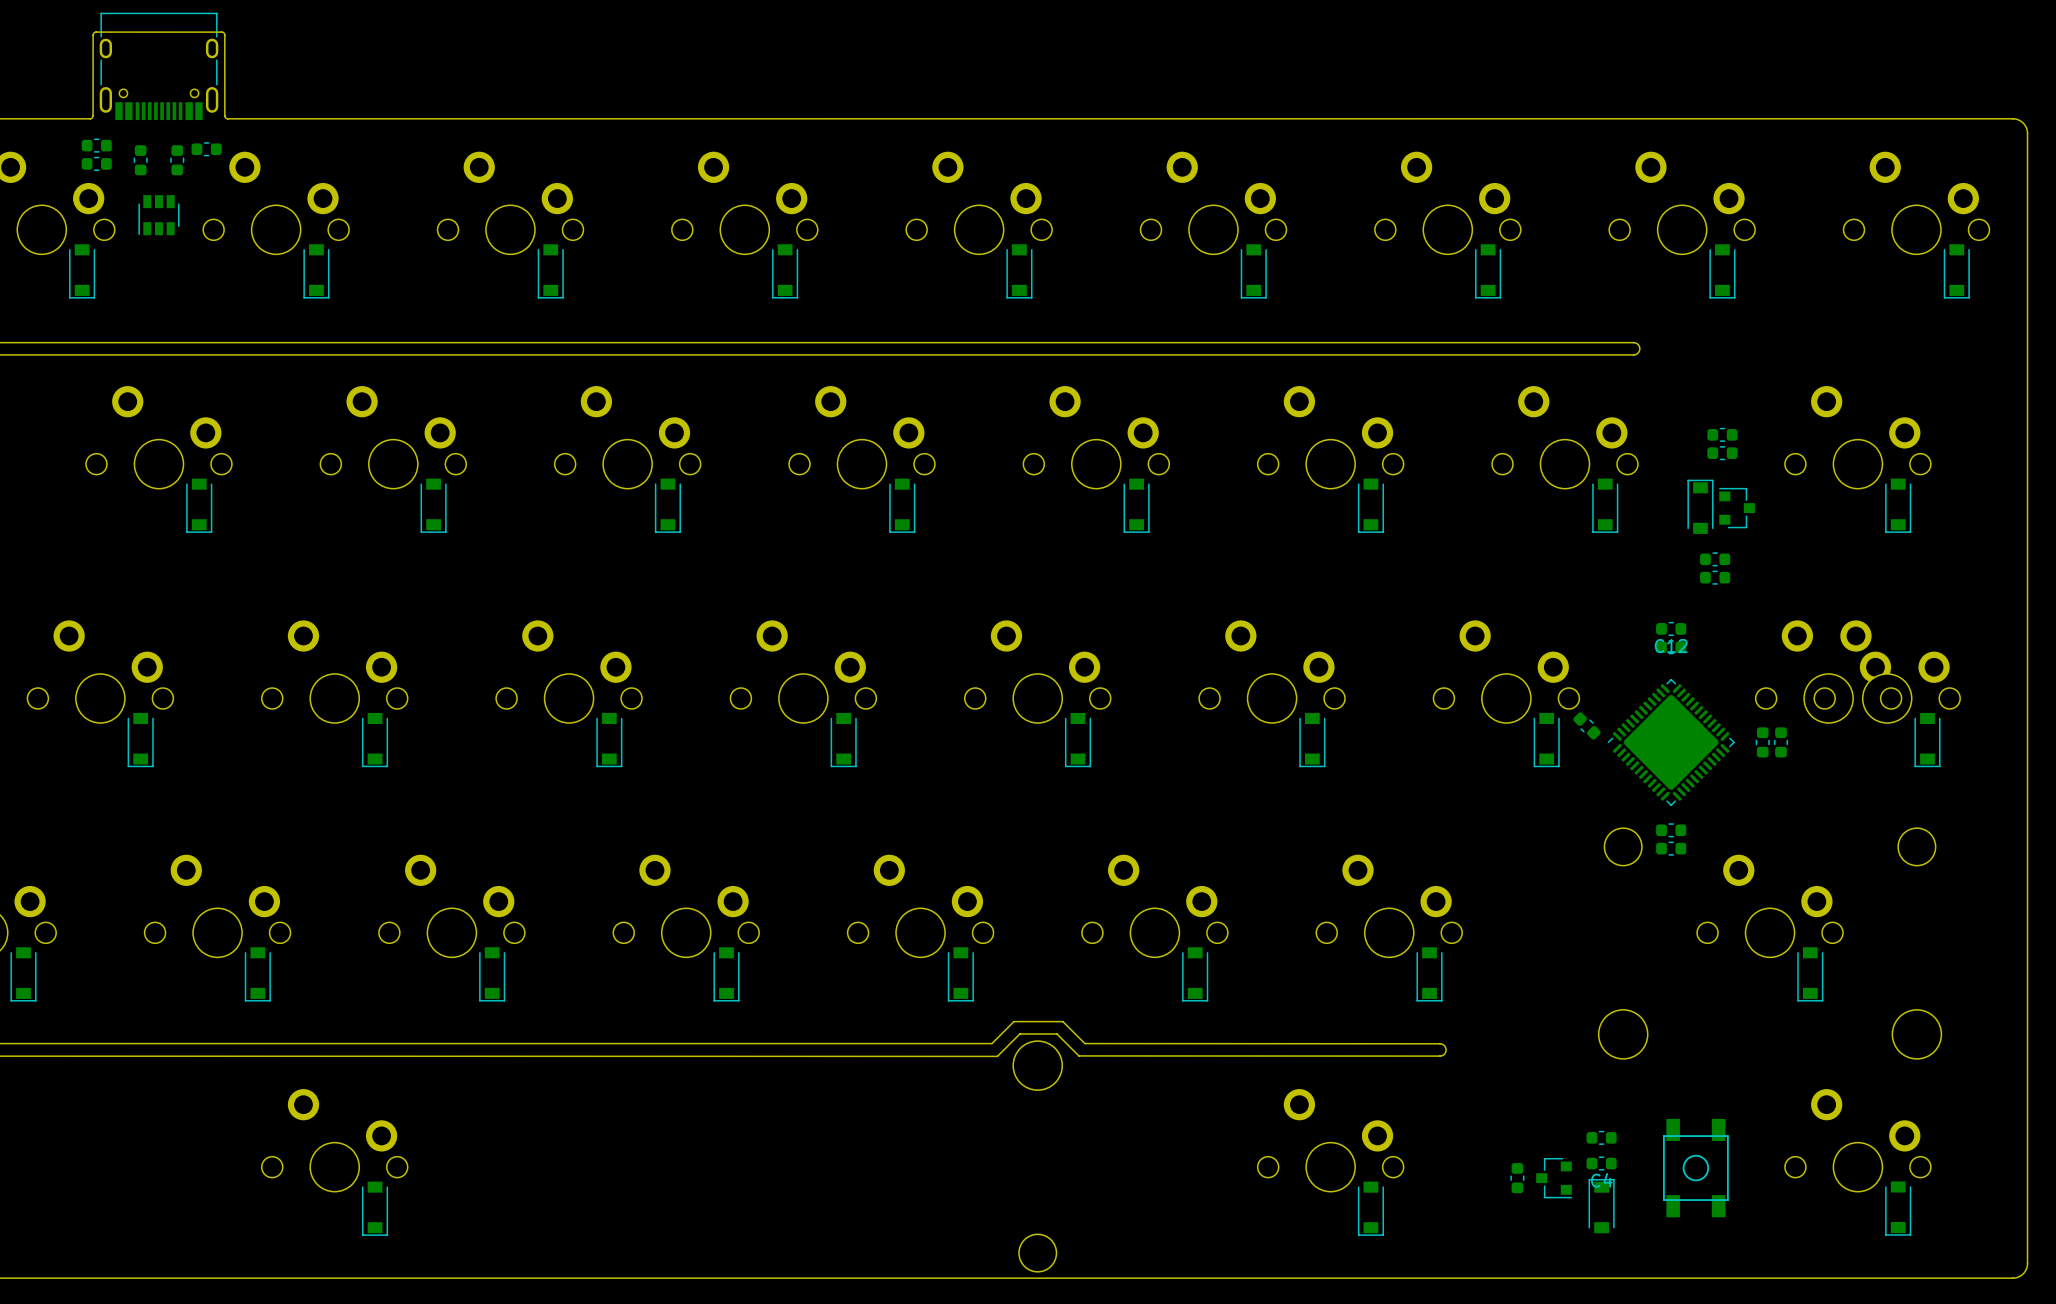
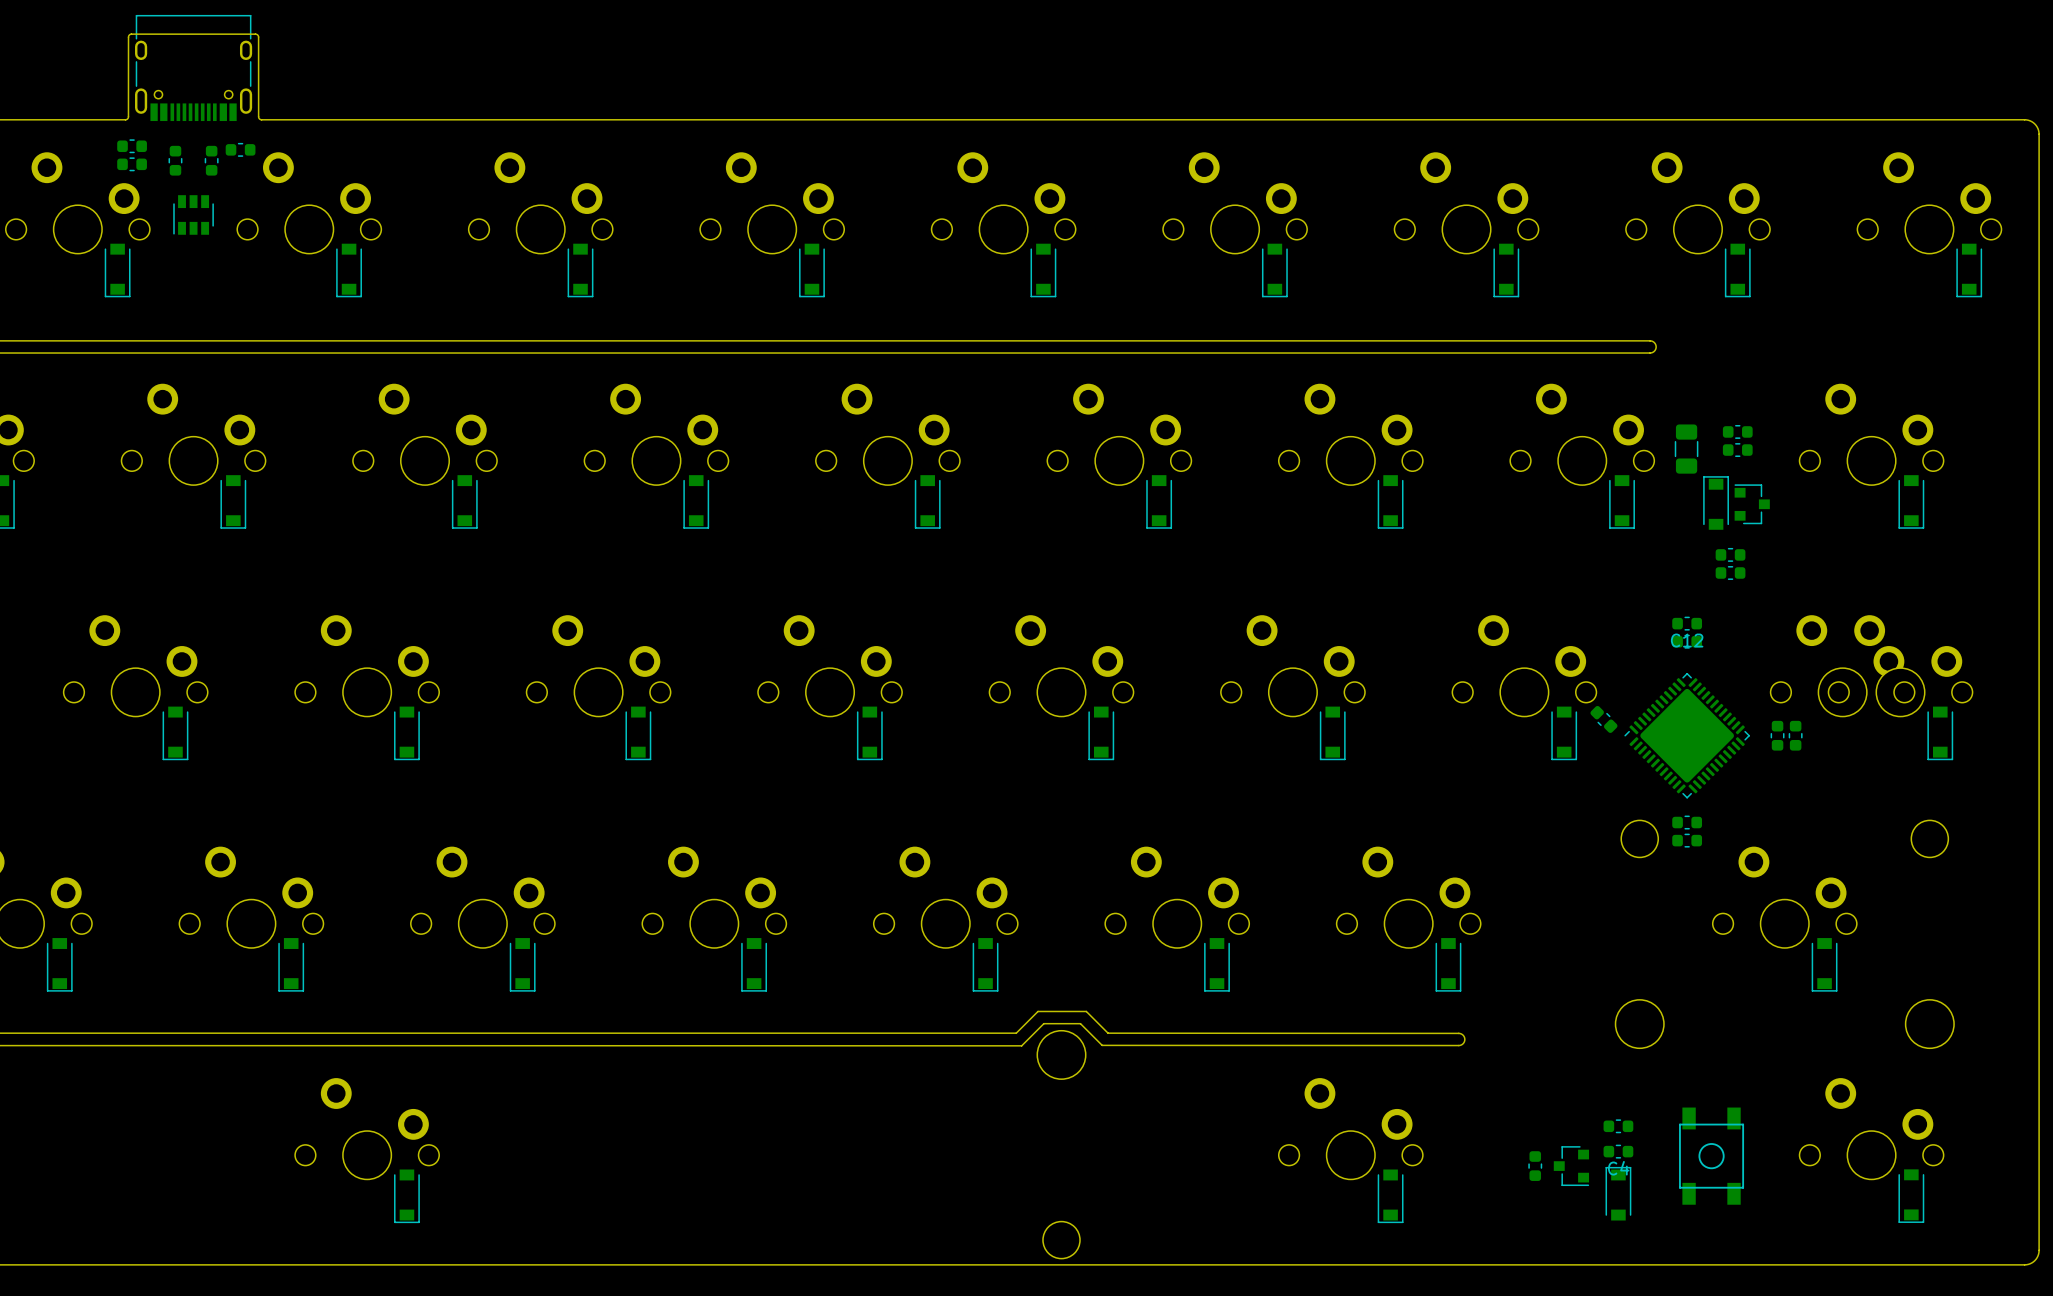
part: none -> (1686, 449)

